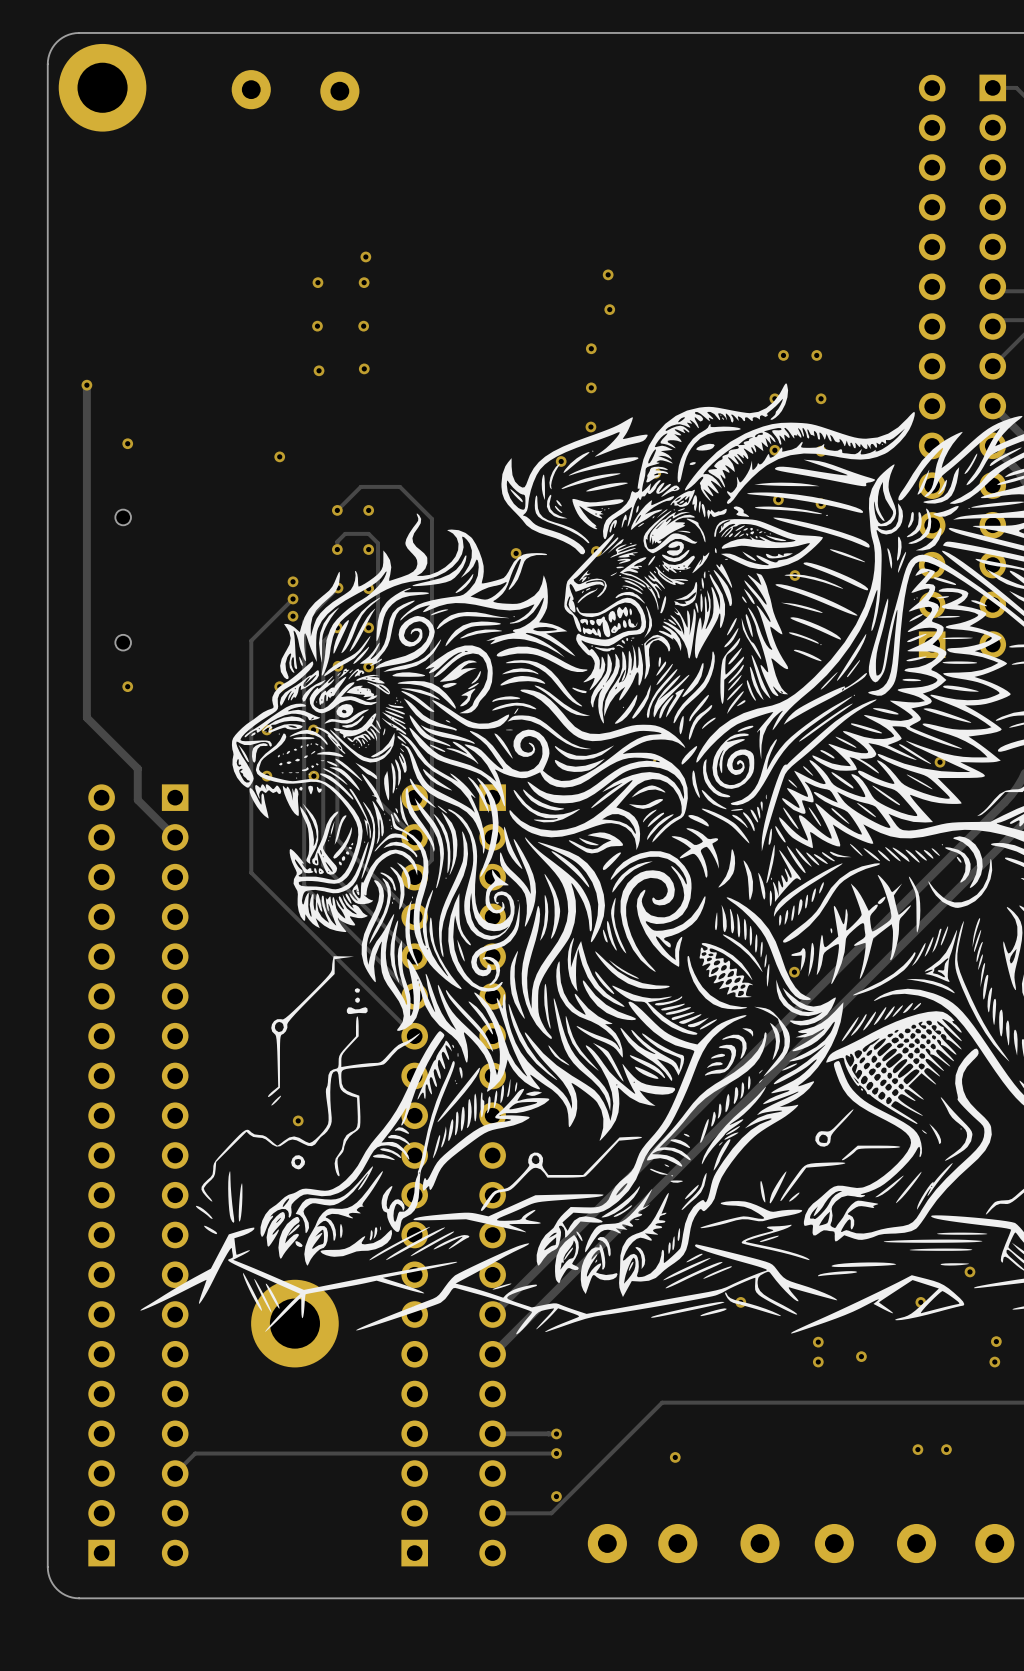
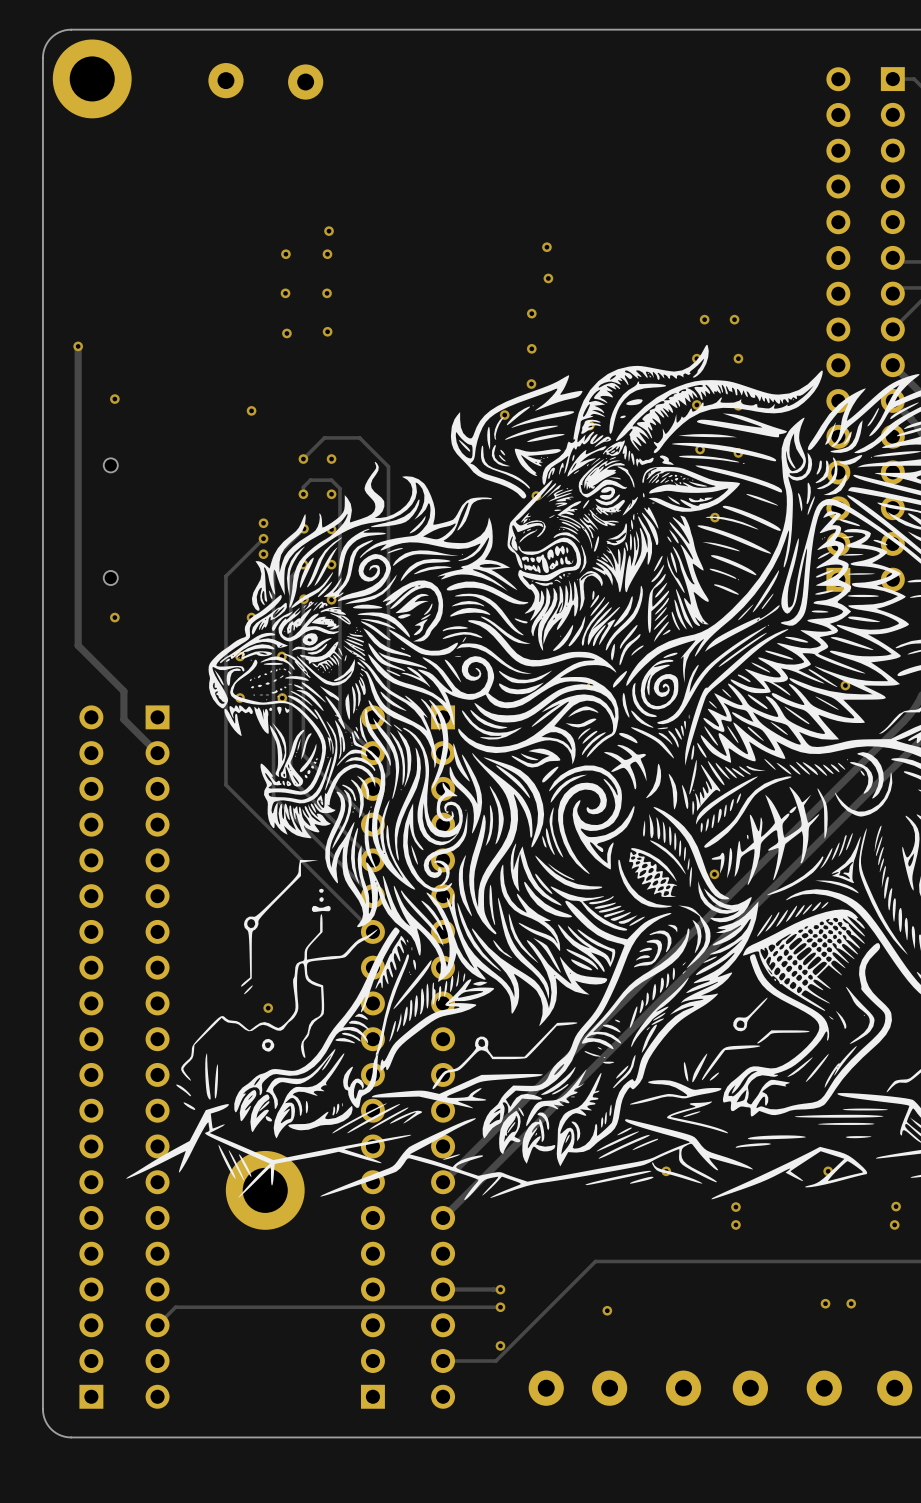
via: (516, 553) -> none
via: (969, 1271) -> none
via: (861, 1356) -> none

